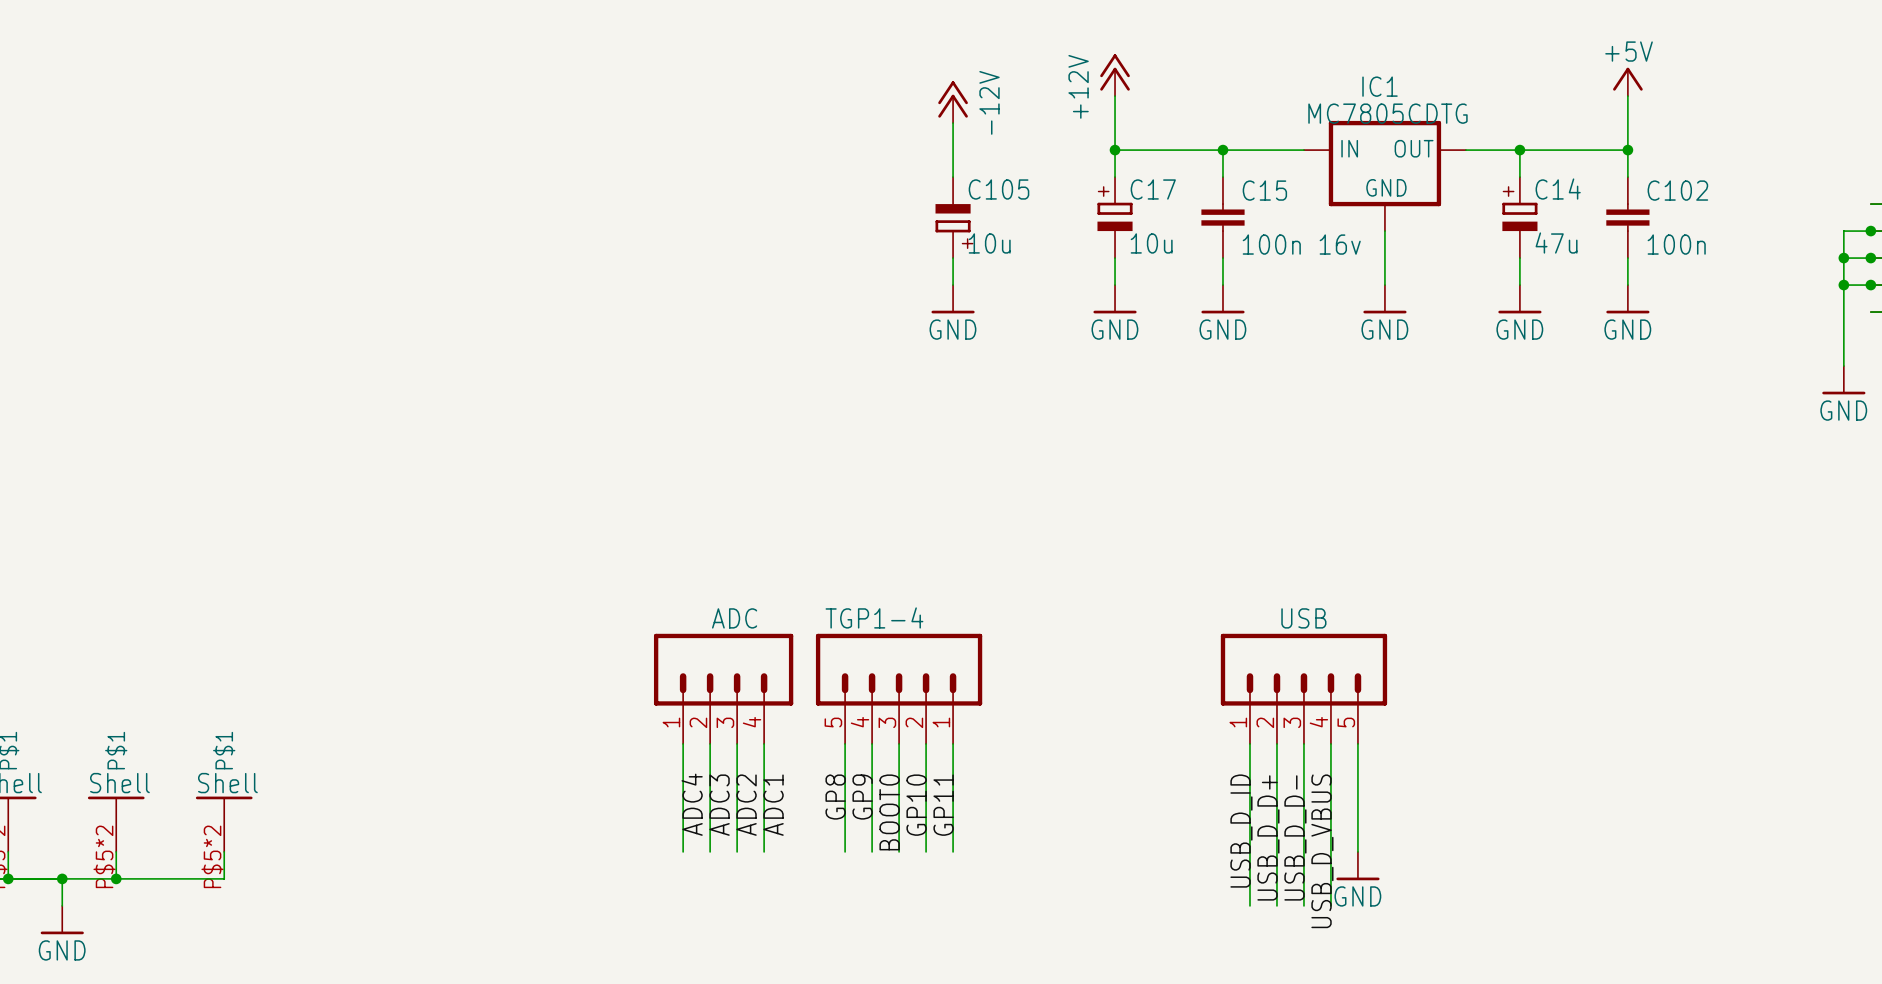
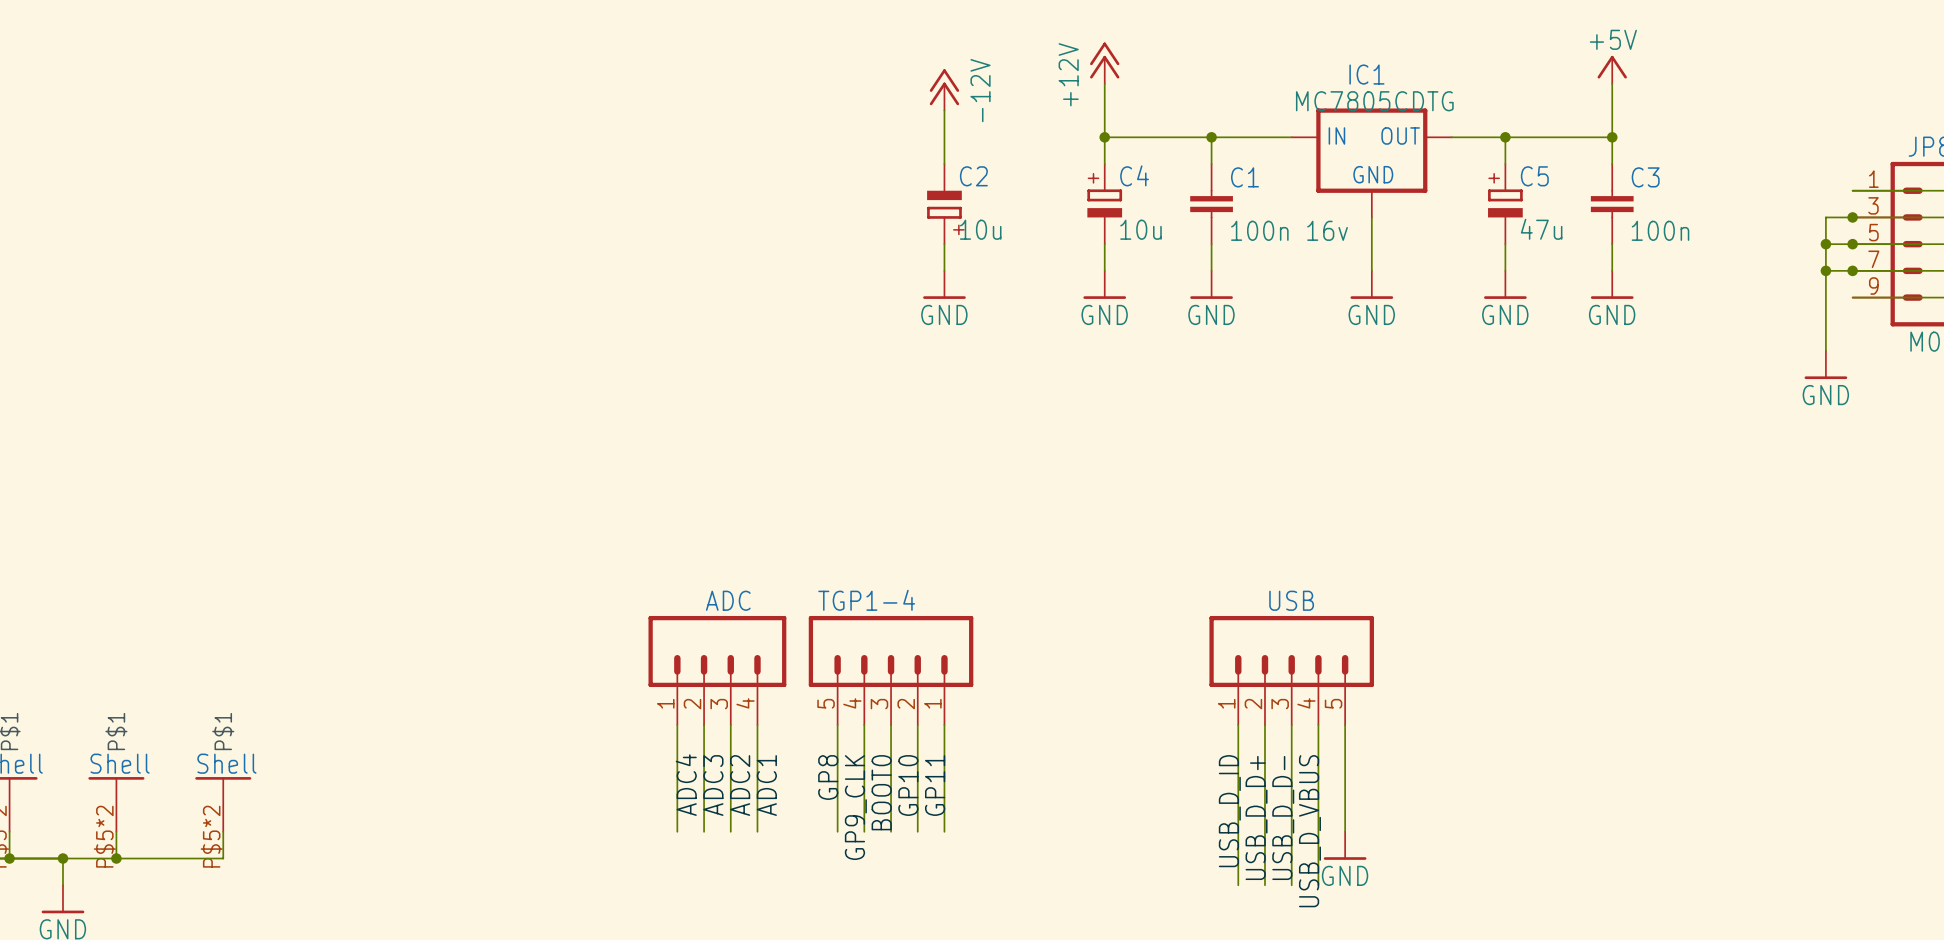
C105 name: C105 (998, 189) -> C2 (973, 176)
C17 name: C17 (1153, 189) -> C4 (1134, 175)
C14 name: C14 (1558, 189) -> C5 (1534, 176)
C15 name: C15 (1264, 190) -> C1 (1245, 177)
C102 name: C102 (1677, 190) -> C3 (1645, 177)
label: GP9 (862, 797) -> GP9_CLK (855, 807)

